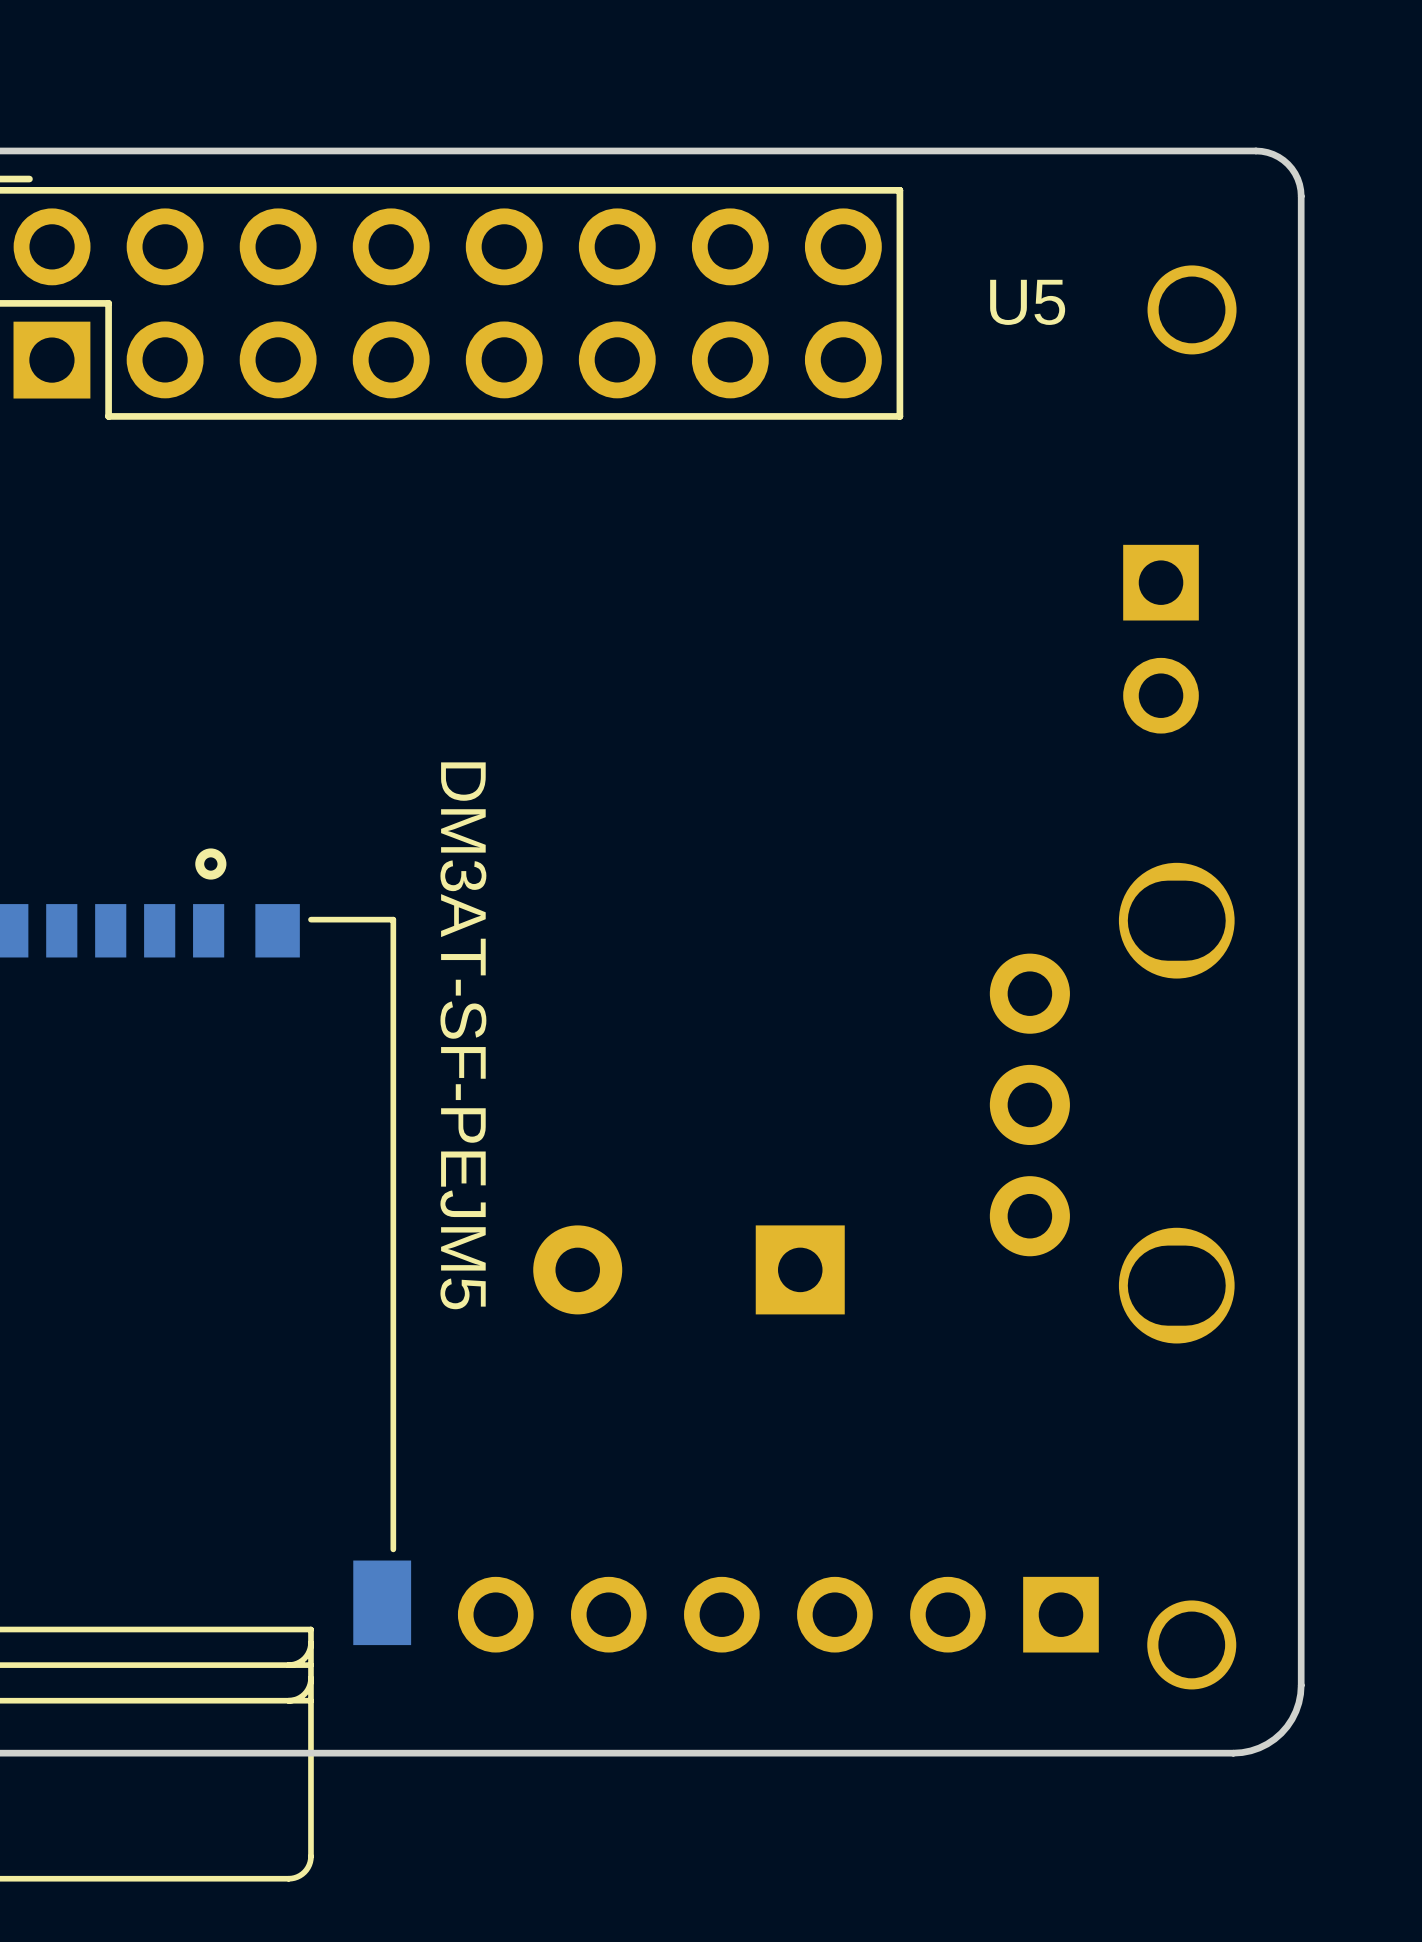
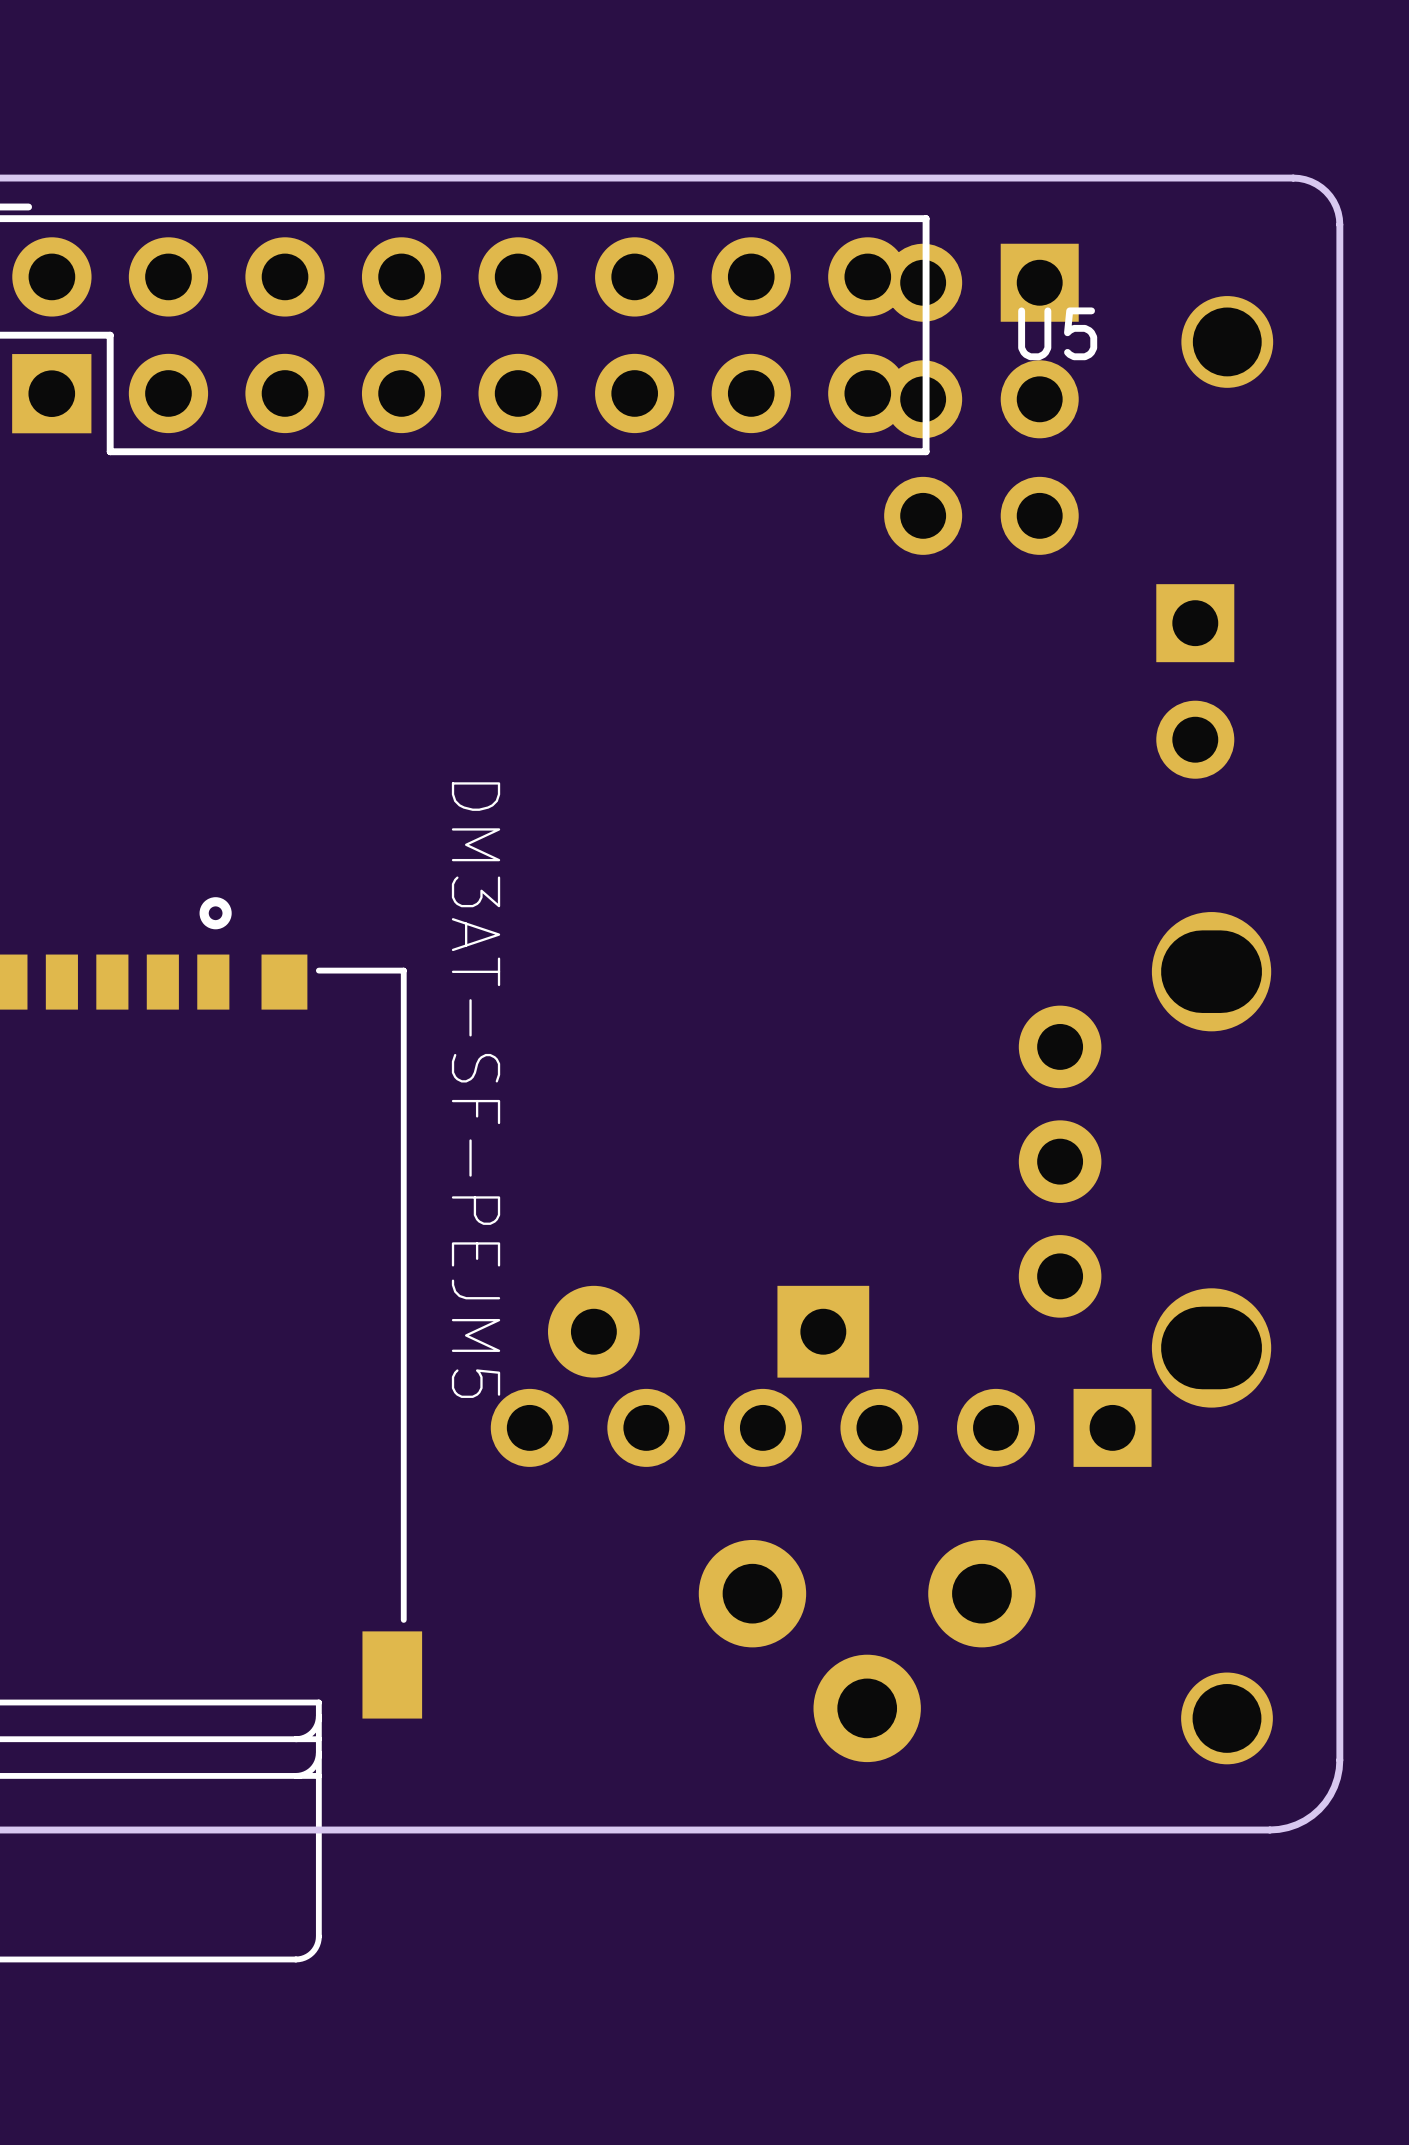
part: none -> (981, 399)
part: none -> (867, 1651)
part position: (778, 1614) -> (821, 1427)

